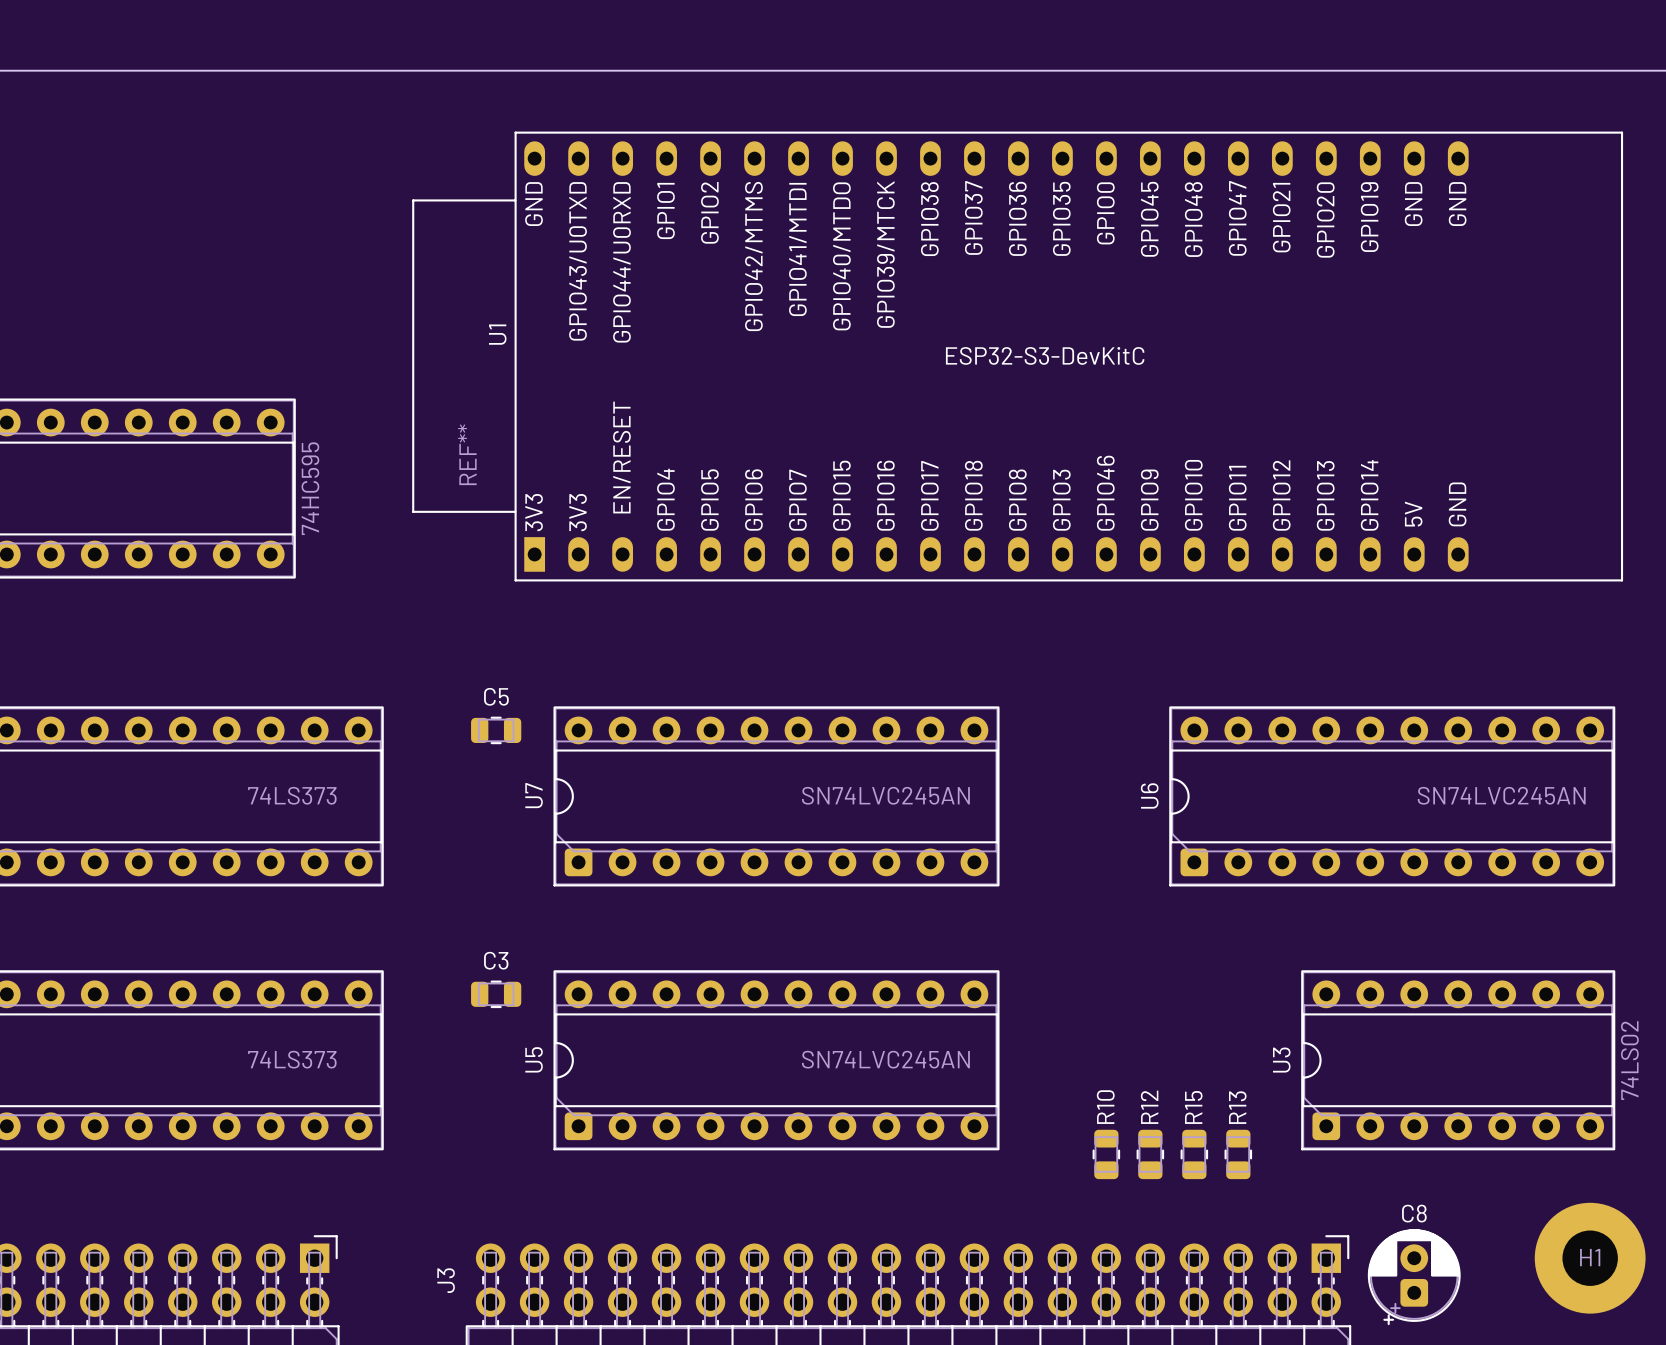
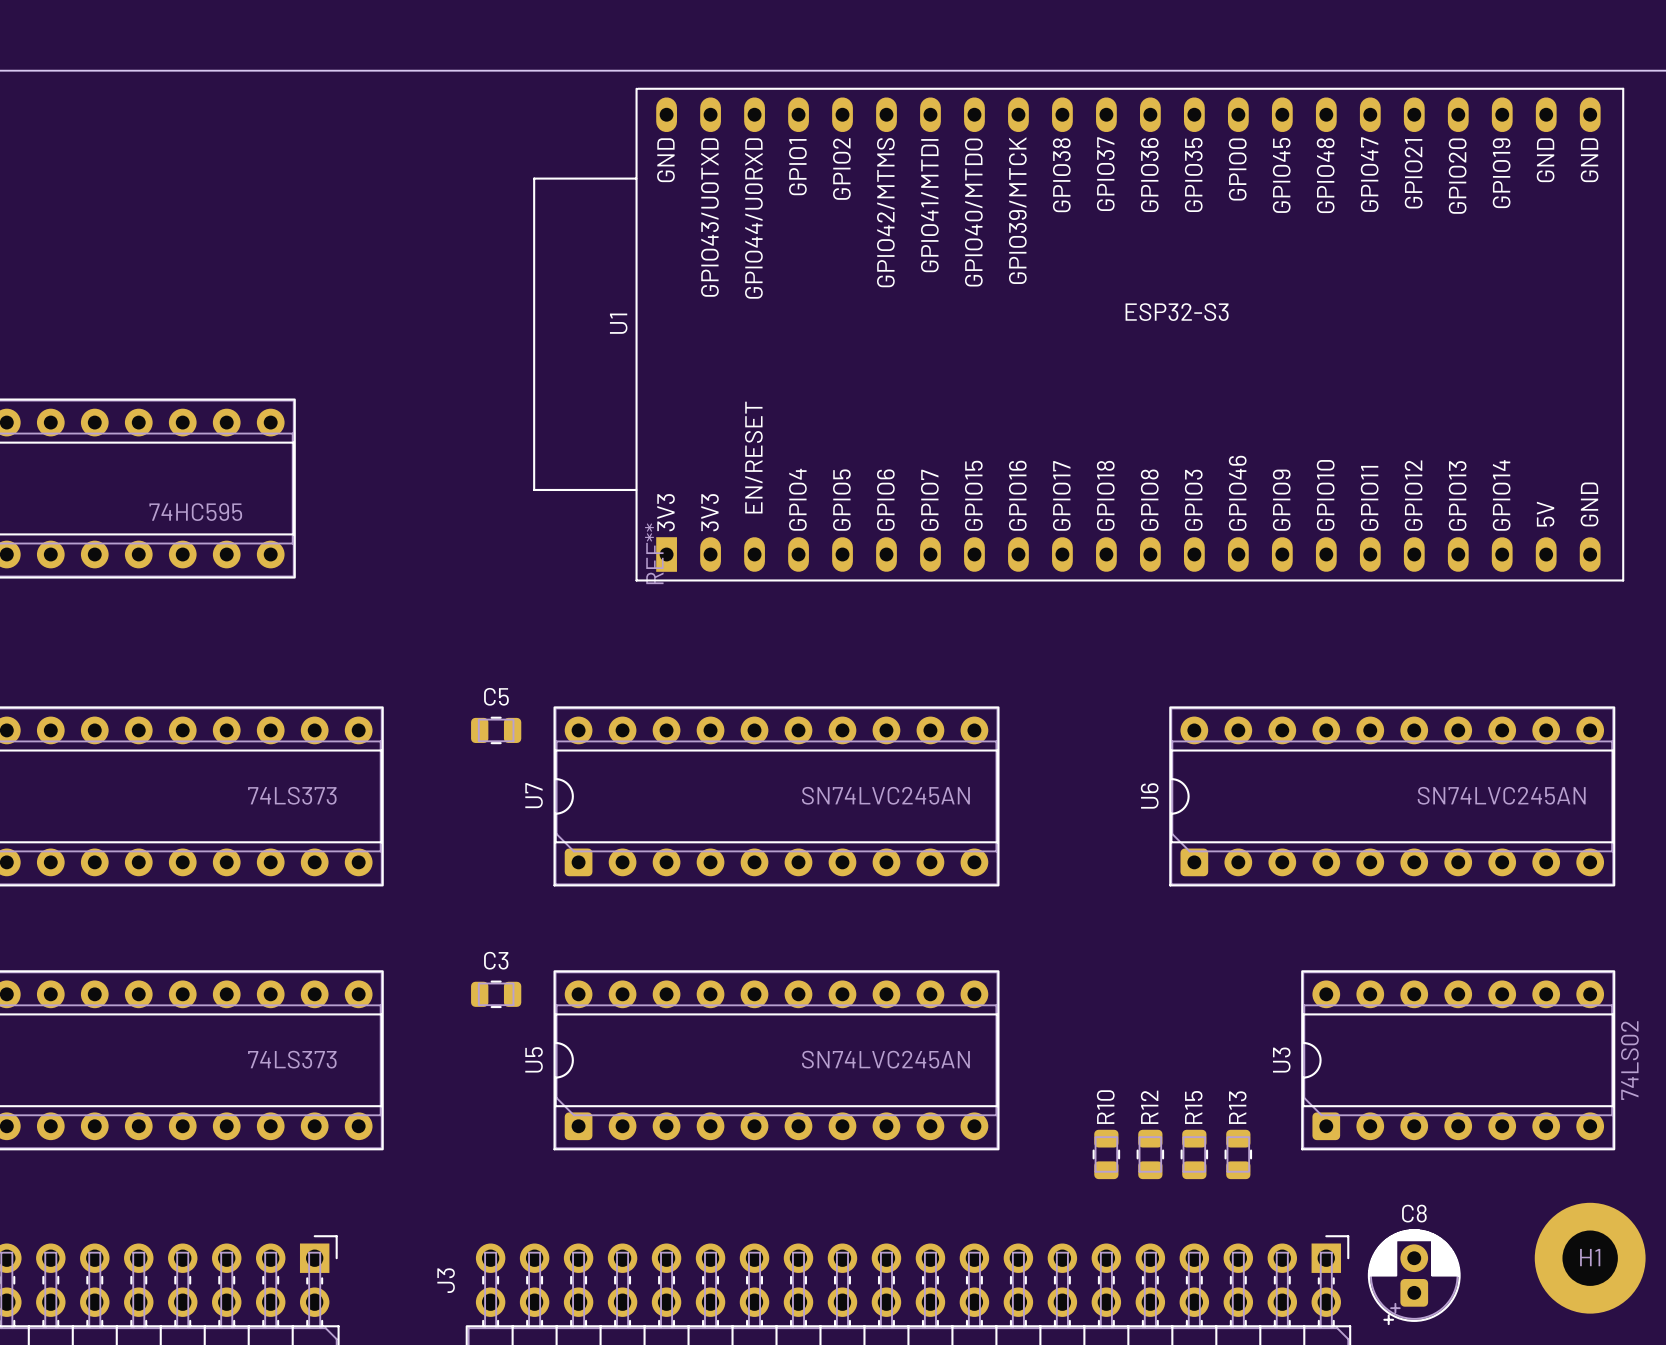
U1 footprint: [412, 131, 1624, 582] -> [533, 87, 1625, 582]
U1 name position: U1 (497, 334) -> U1 (618, 323)
U1 value: ESP32-S3-DevKitC (1045, 355) -> ESP32-S3 (1177, 312)
part value rotation: 0° (310, 488) -> 90° clockwise (195, 512)

